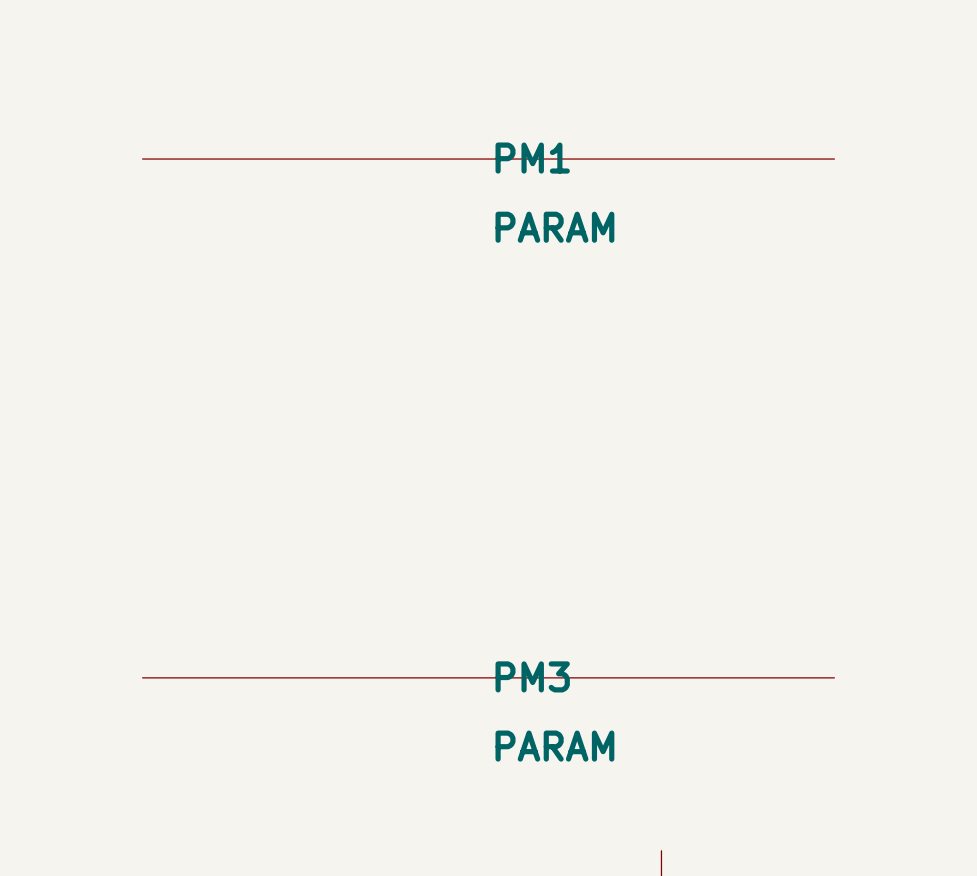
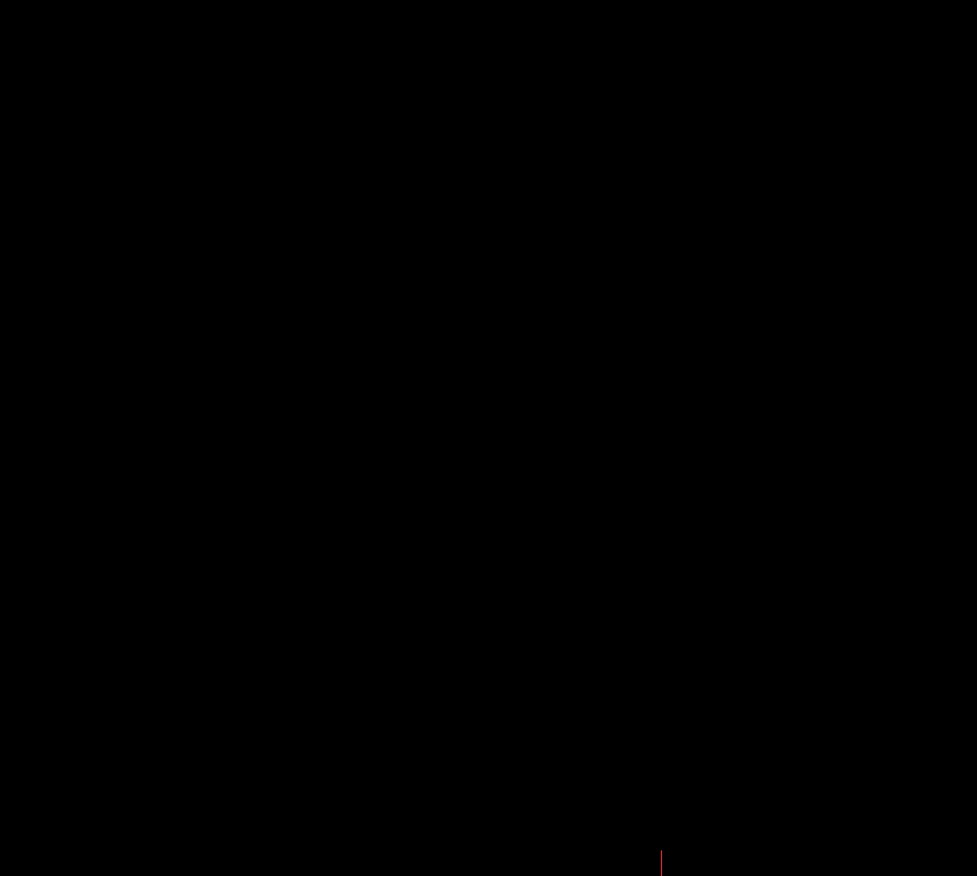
PM1: PARAM (488, 159) -> none
PM3: PARAM (488, 677) -> none

